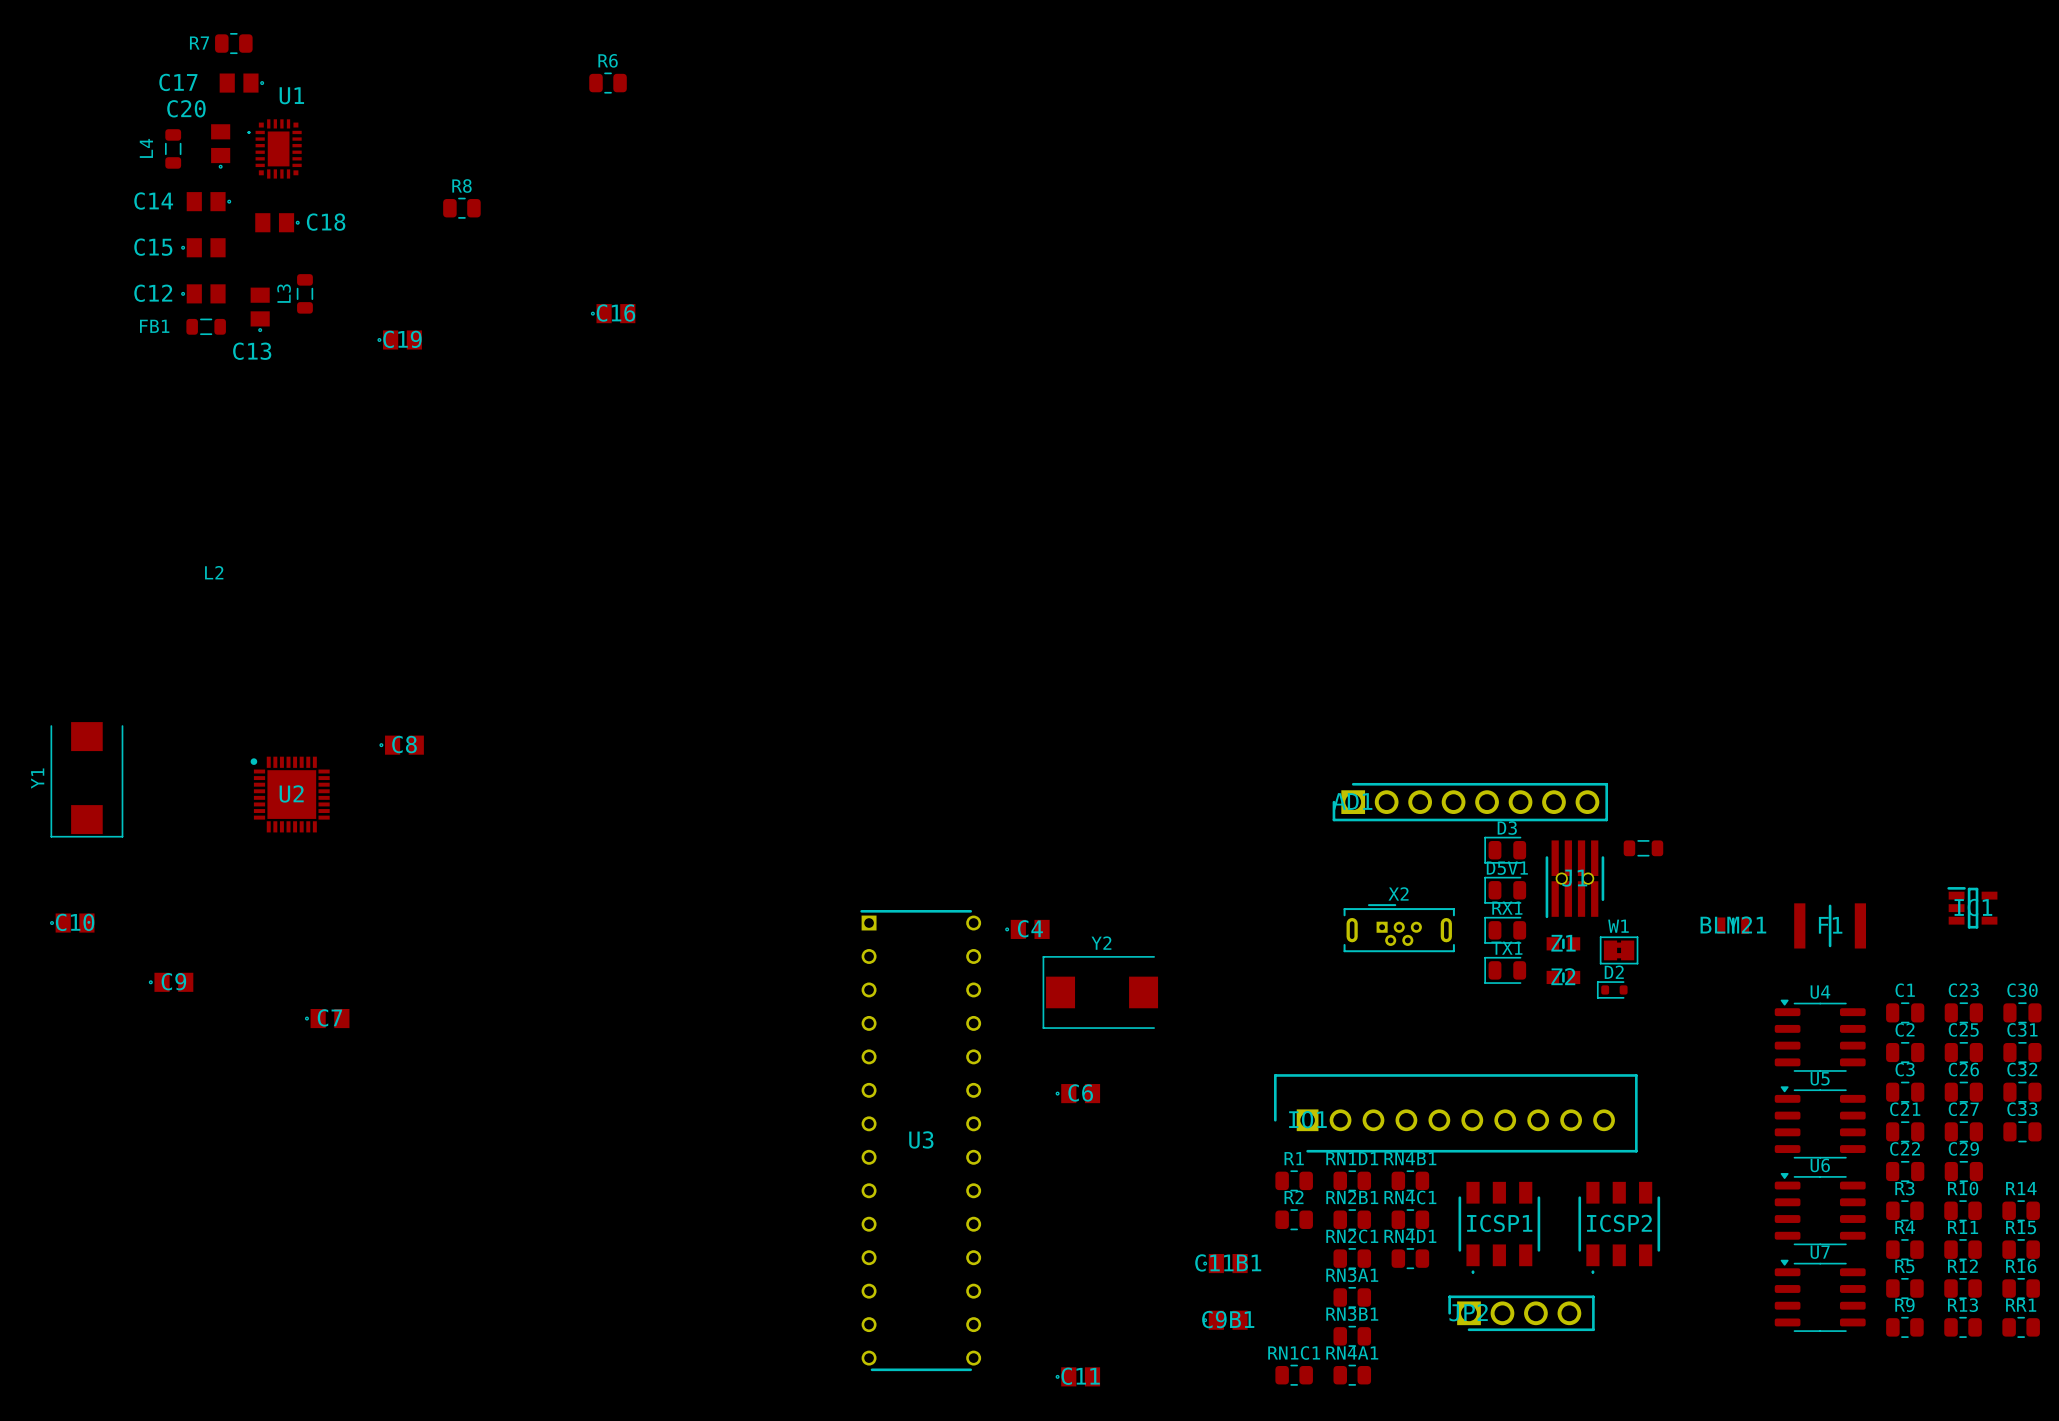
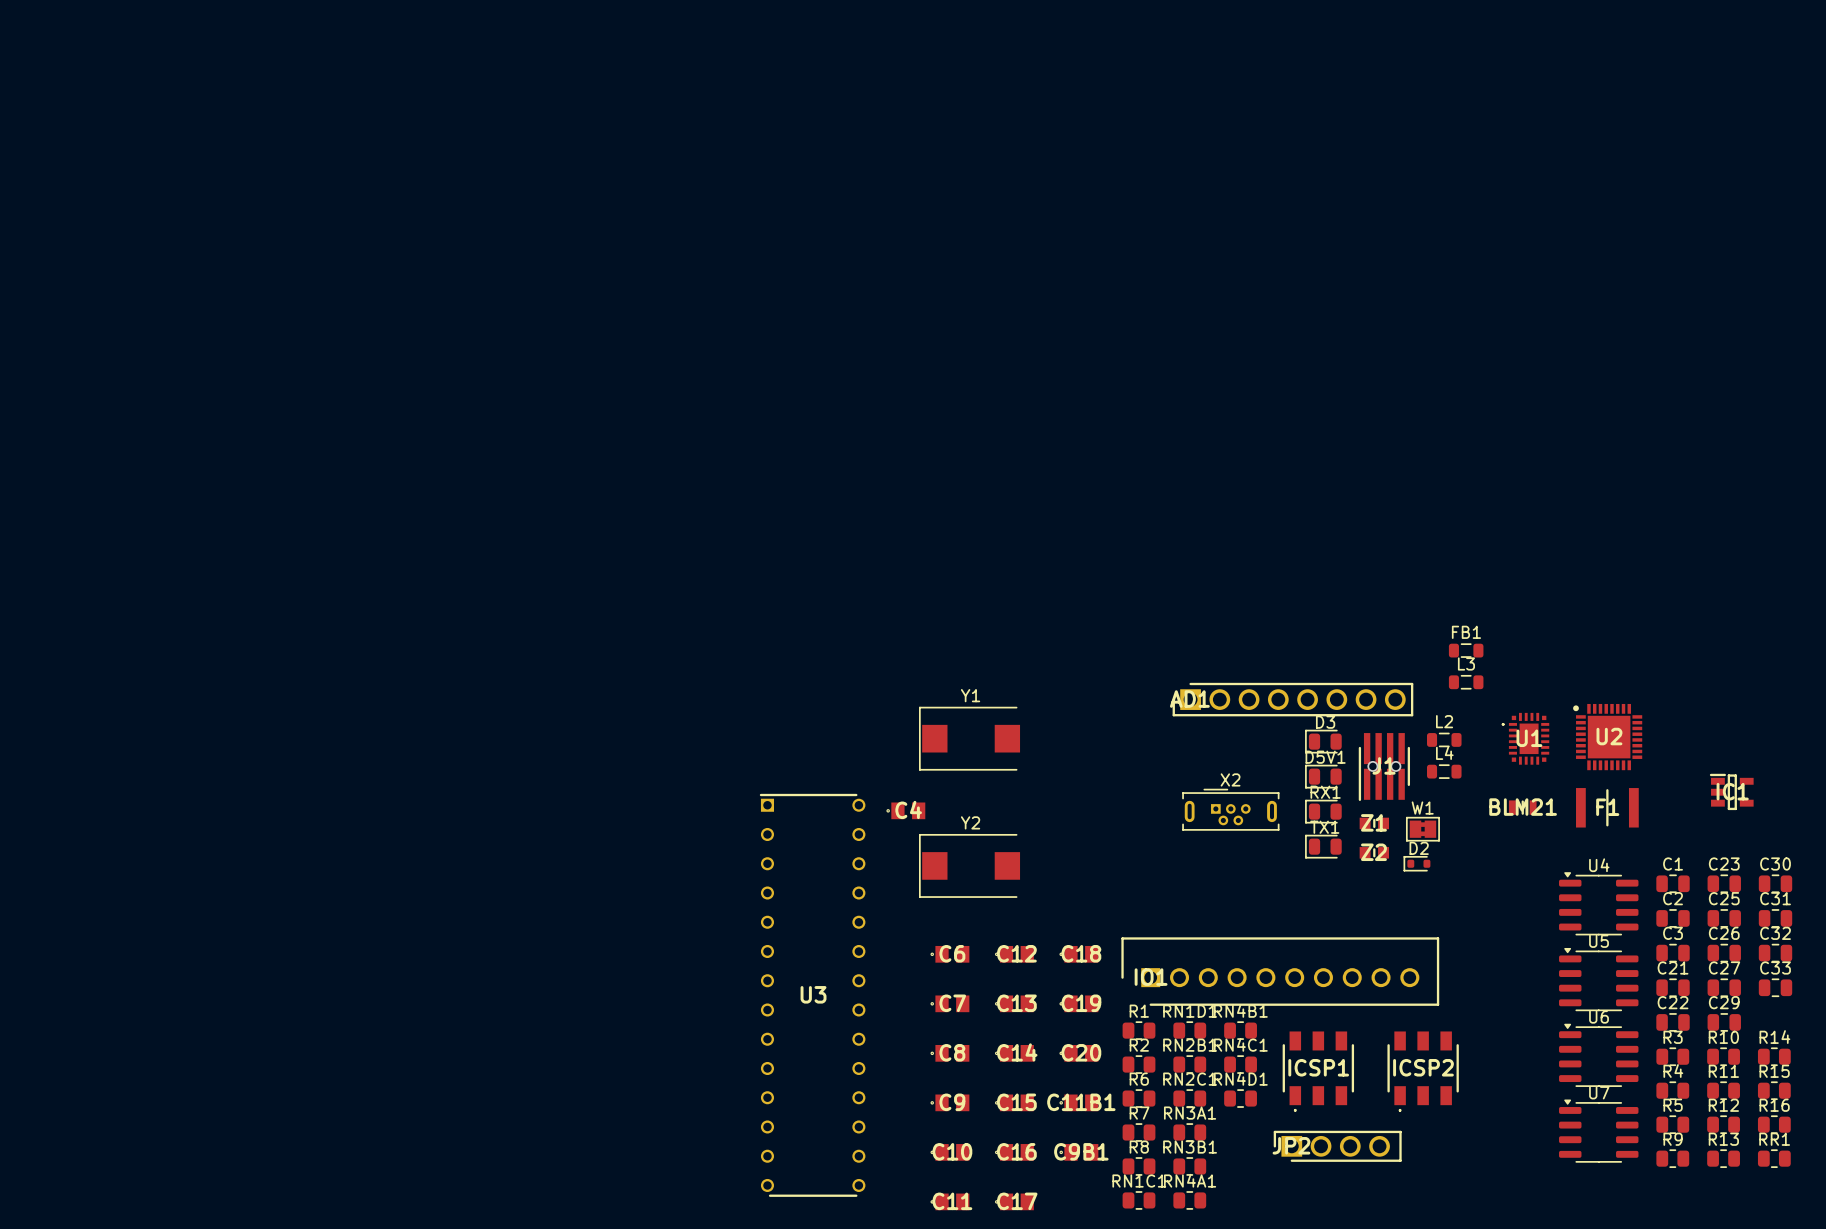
R7 name position: R7 (199, 43) -> R7 (1139, 1113)
R7 position: (233, 43) -> (1138, 1132)
C17 name position: C17 (178, 82) -> C17 (1017, 1201)
C17 rotation: 0° (241, 83) -> 180° (1014, 1201)
C17 position: (241, 83) -> (1014, 1201)
R6 position: (608, 83) -> (1138, 1098)
U1 name position: U1 (291, 95) -> U1 (1529, 738)
C20 name position: C20 (186, 108) -> C20 (1081, 1052)
C20 rotation: 0° (220, 146) -> 90° clockwise (1078, 1053)
C20 position: (220, 146) -> (1078, 1053)
L4 rotation: 0° (173, 148) -> 90° clockwise (1444, 771)
L4 position: (173, 148) -> (1444, 771)
U1 position: (274, 148) -> (1525, 738)
C14 name position: C14 (153, 201) -> C14 (1017, 1052)
C14 rotation: 0° (208, 201) -> 180° (1014, 1053)
C14 position: (208, 201) -> (1014, 1053)
R8 position: (461, 208) -> (1138, 1166)
C18 rotation: 0° (277, 222) -> 180° (1078, 954)
C18 position: (277, 222) -> (1078, 954)
C18 name position: C18 (326, 222) -> C18 (1081, 953)
C15 name position: C15 (153, 247) -> C15 (1016, 1102)
C15 position: (203, 247) -> (1014, 1102)
C12 name position: C12 (153, 293) -> C12 (1016, 953)
C12 position: (203, 293) -> (1014, 954)
L3 rotation: 0° (304, 293) -> 90° clockwise (1466, 682)
L3 position: (304, 293) -> (1466, 682)
C13 rotation: 0° (260, 309) -> 90° clockwise (1014, 1003)
C13 position: (260, 309) -> (1014, 1003)
C16 position: (613, 313) -> (1014, 1152)
FB1 name position: FB1 (154, 326) -> FB1 (1466, 632)
FB1 position: (206, 326) -> (1466, 650)
C19 position: (399, 339) -> (1078, 1003)
C13 name position: C13 (252, 351) -> C13 (1016, 1003)
L2 name position: L2 (214, 572) -> L2 (1444, 721)
C8 position: (401, 745) -> (949, 1053)
Y1 rotation: 0° (86, 779) -> 90° clockwise (969, 738)
Y1 position: (86, 779) -> (969, 738)
U2 position: (290, 794) -> (1607, 737)
C10 position: (72, 923) -> (949, 1152)
C9 position: (171, 982) -> (949, 1102)
C7 position: (327, 1018) -> (949, 1003)

